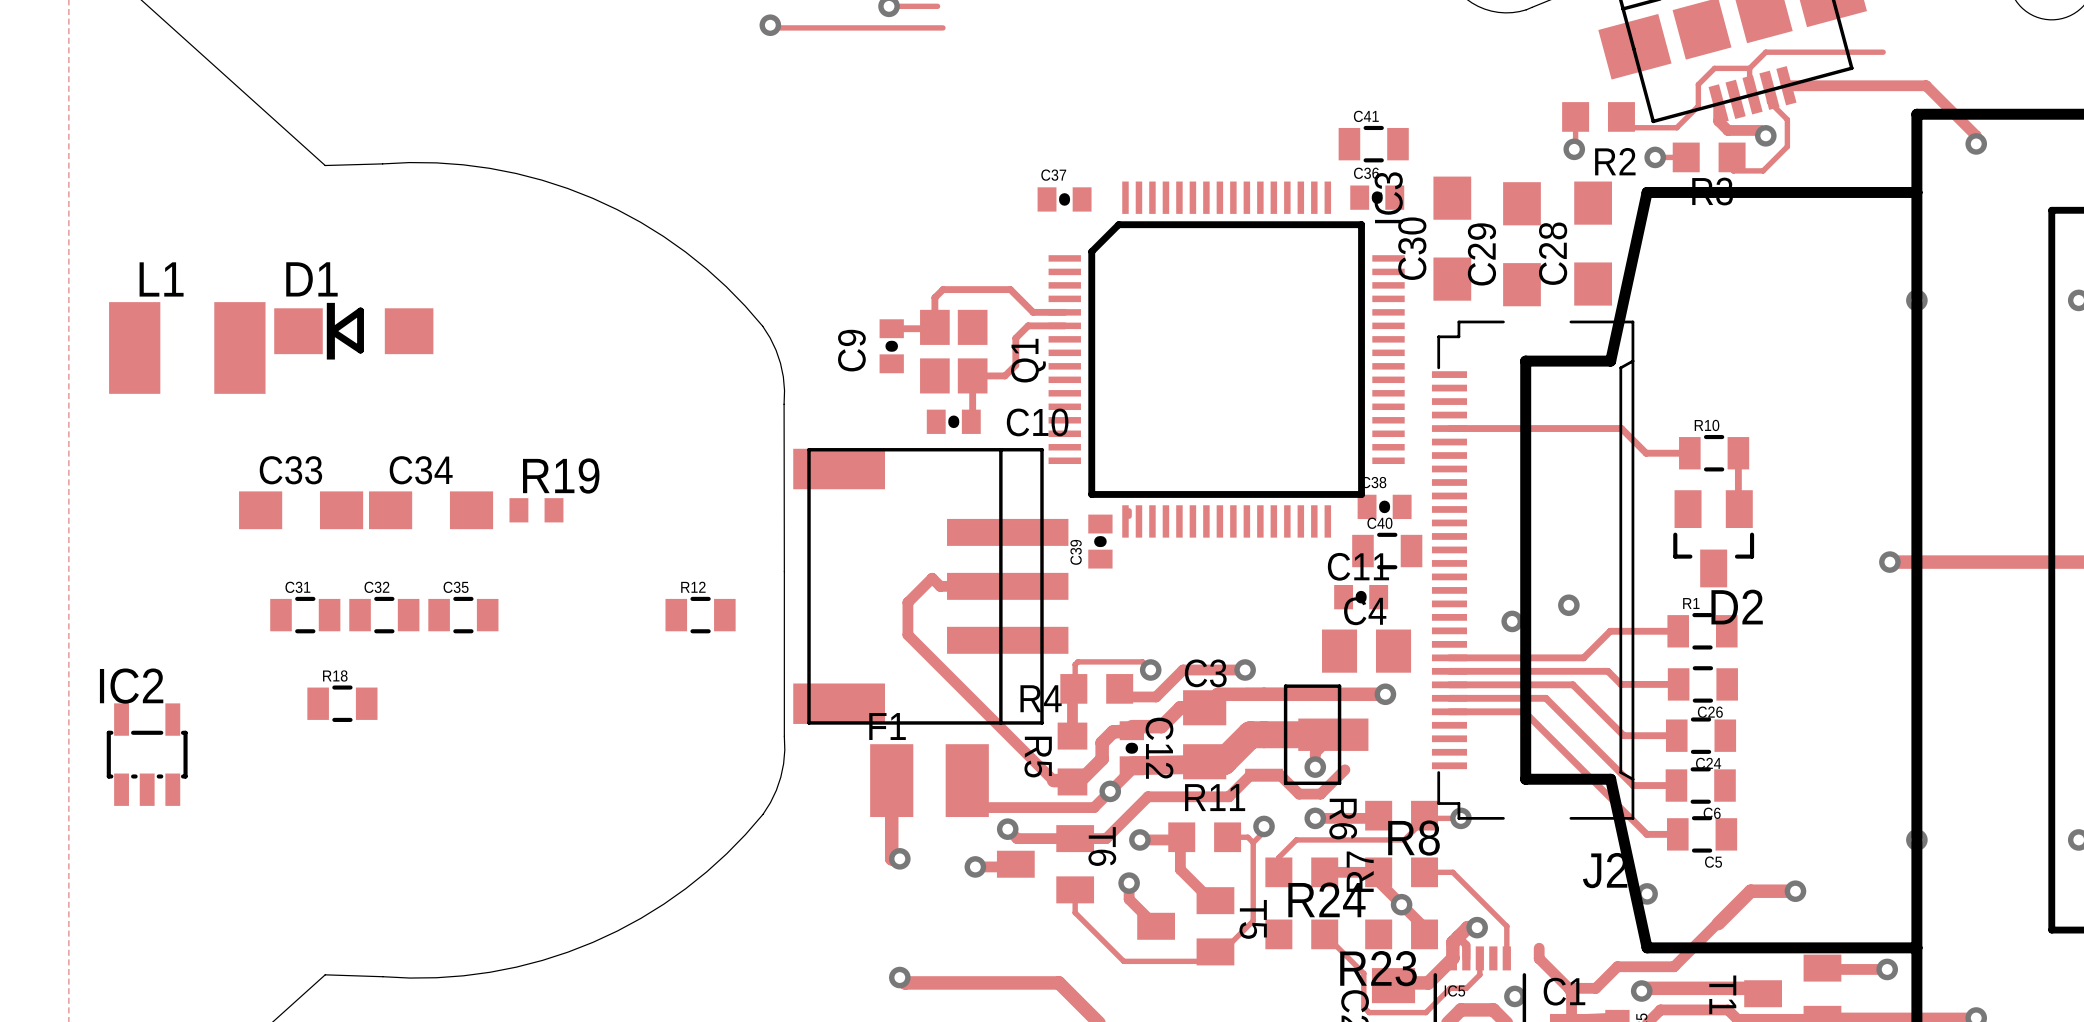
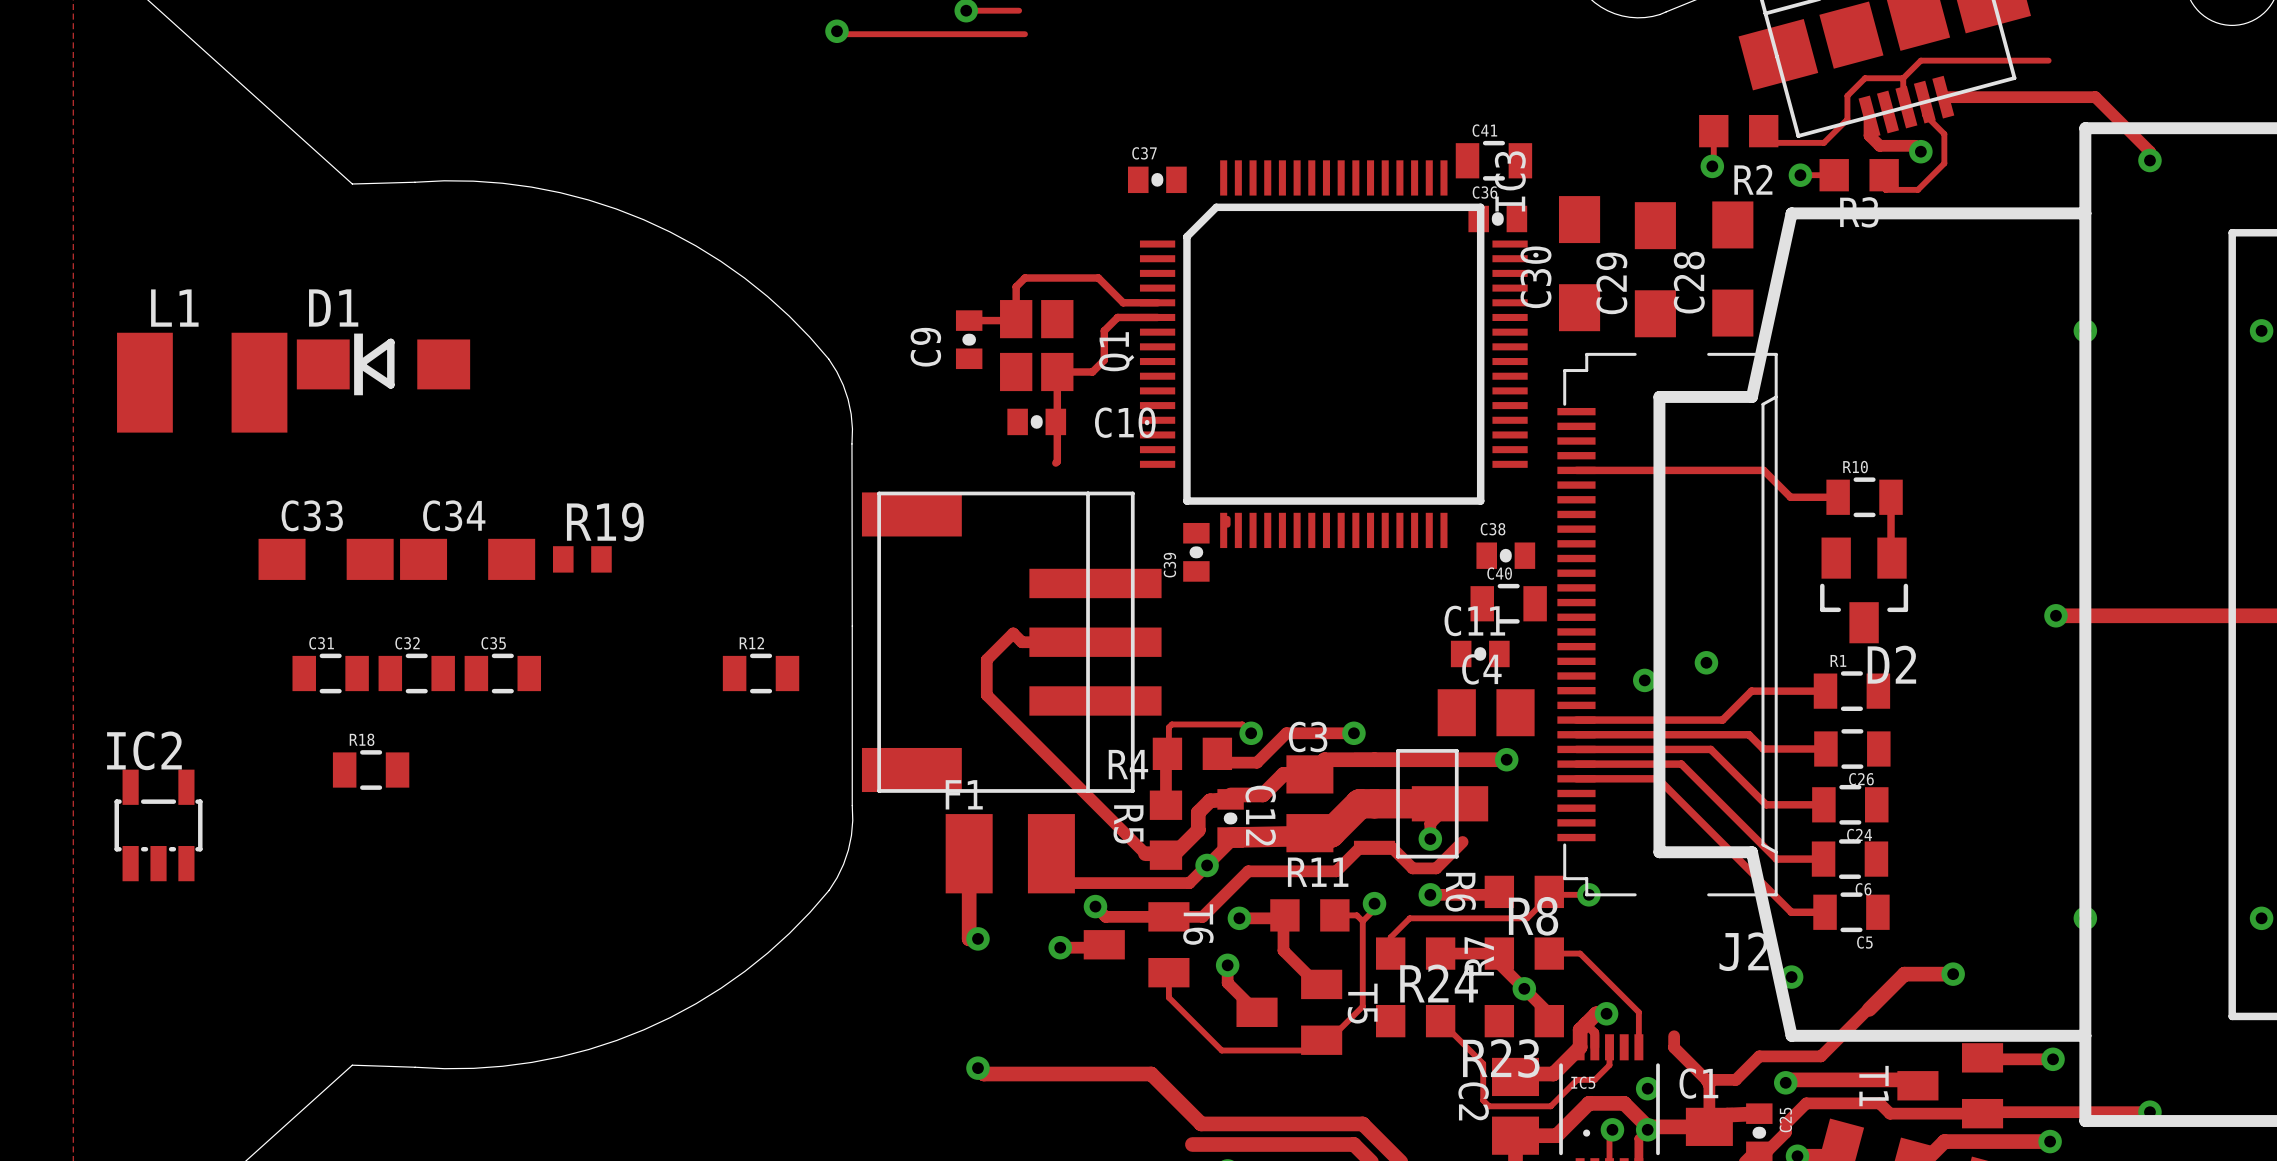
C37 position: (1064, 199) -> (1157, 179)
track: (1064, 312) (1033, 312) (1010, 289) (942, 289) (934, 297) (934, 328) (891, 328) -> (1157, 302) (1123, 302) (1098, 278) (1024, 278) (1016, 286) (1016, 320) (969, 320)
track: (1064, 325) (1028, 325) (1015, 338) (1015, 365) (1005, 375) (972, 375) -> (1157, 317) (1117, 317) (1104, 330) (1104, 360) (1092, 371) (1057, 371) (1057, 413)
C9 position: (891, 346) -> (969, 339)
Q1 position: (953, 351) -> (1036, 345)
IC3 position: (1226, 359) -> (1333, 354)
C10 position: (953, 421) -> (1036, 421)
track: (1129, 510) (1129, 516) -> (1227, 518) (1227, 524)
C39 position: (1100, 541) -> (1196, 552)

